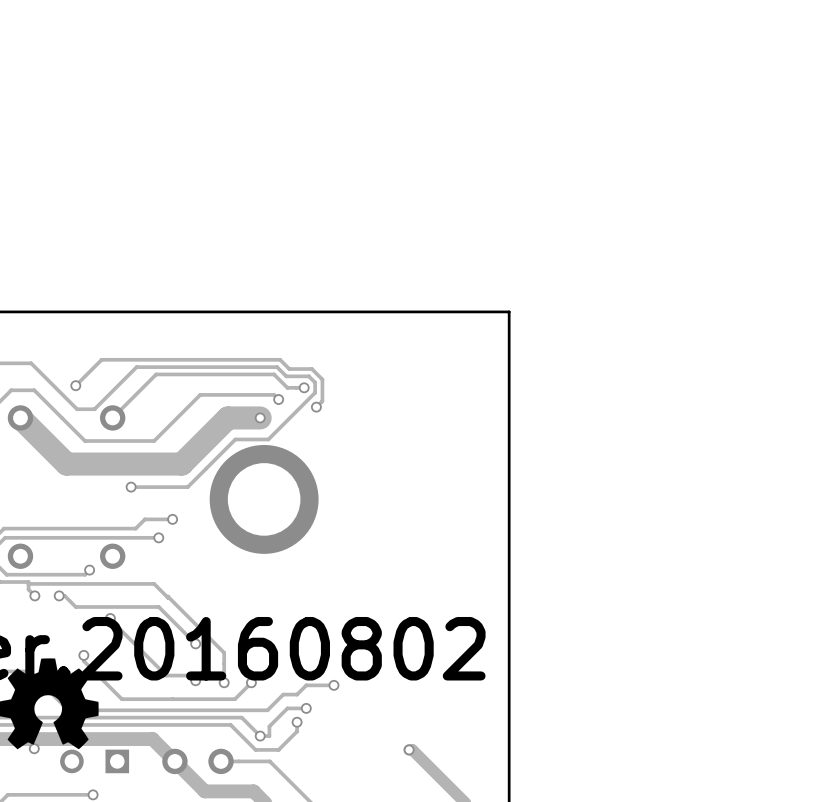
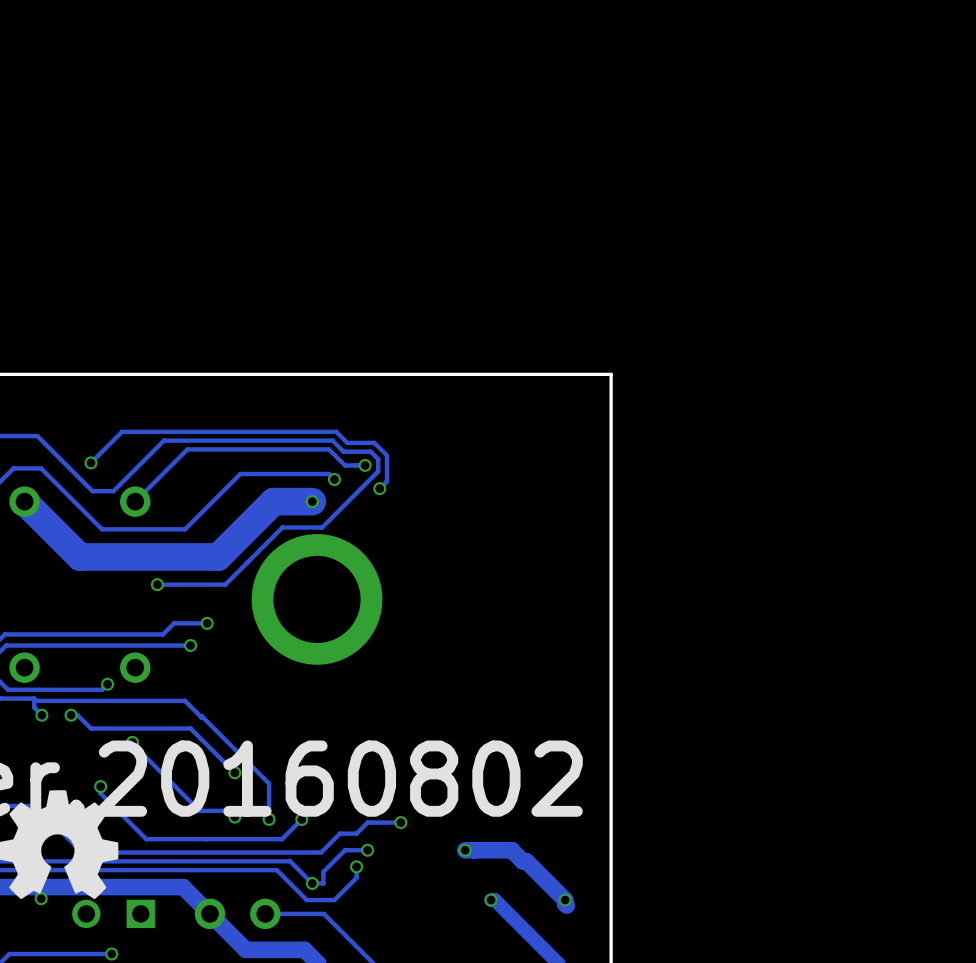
track: none -> (465, 850) (511, 850) (522, 861) (526, 861) (565, 900) (566, 905)
via: none -> (465, 850)
via: none -> (565, 900)

